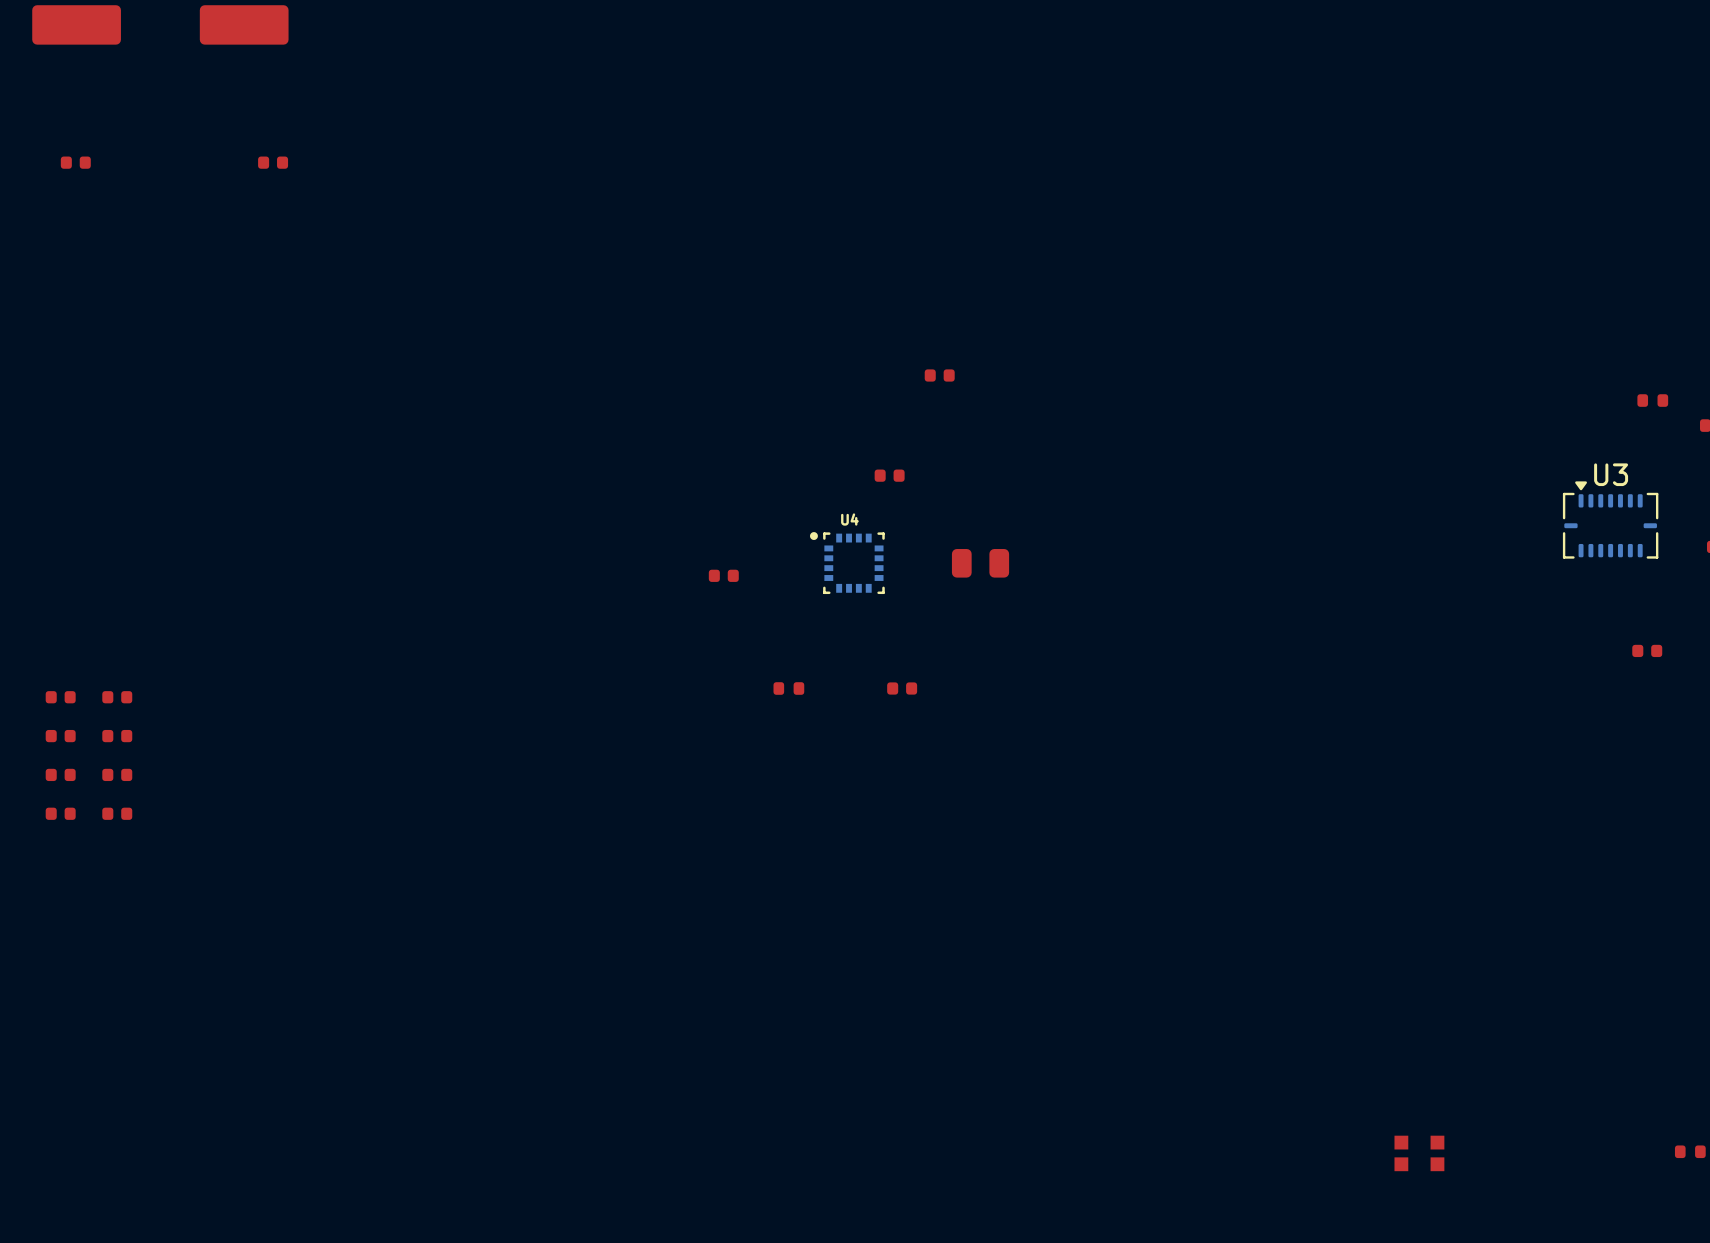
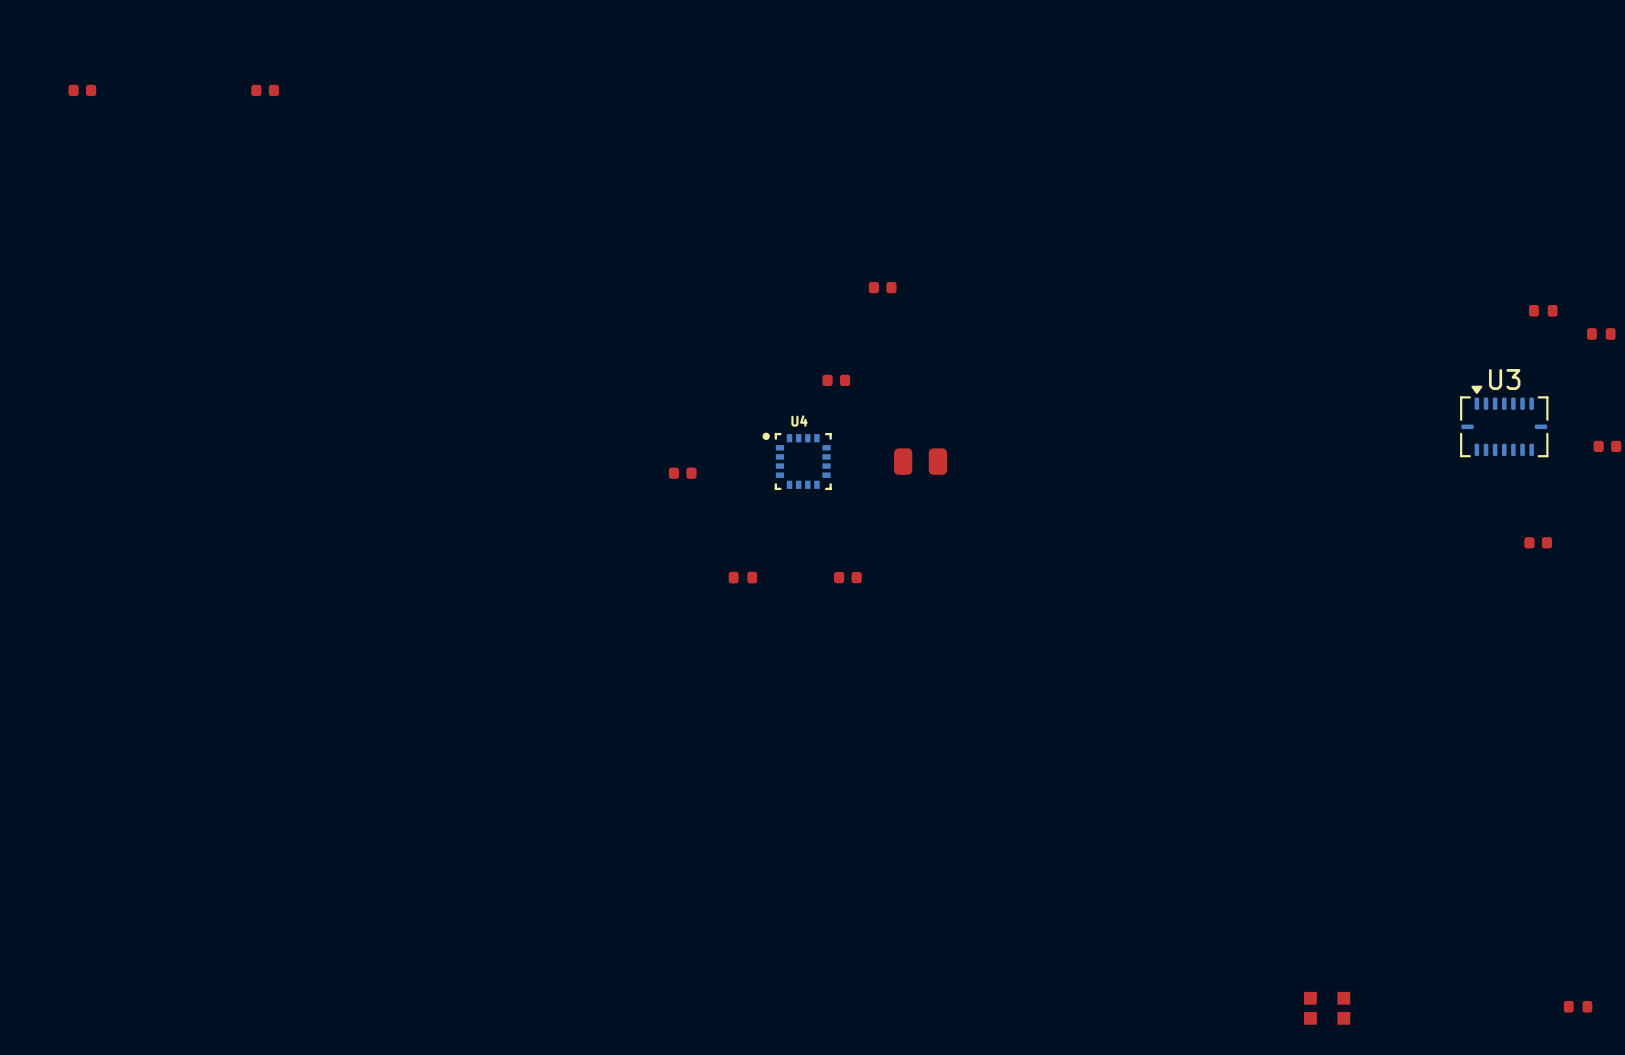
part: (60, 697) -> none
part: (117, 697) -> none
part: (60, 736) -> none
part: (117, 736) -> none
part: (60, 774) -> none
part: (117, 774) -> none
part: (60, 813) -> none
part: (117, 813) -> none

